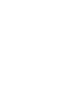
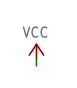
power symbol: none -> VCC (36, 51)
wire: none -> (36, 58) (36, 65)

